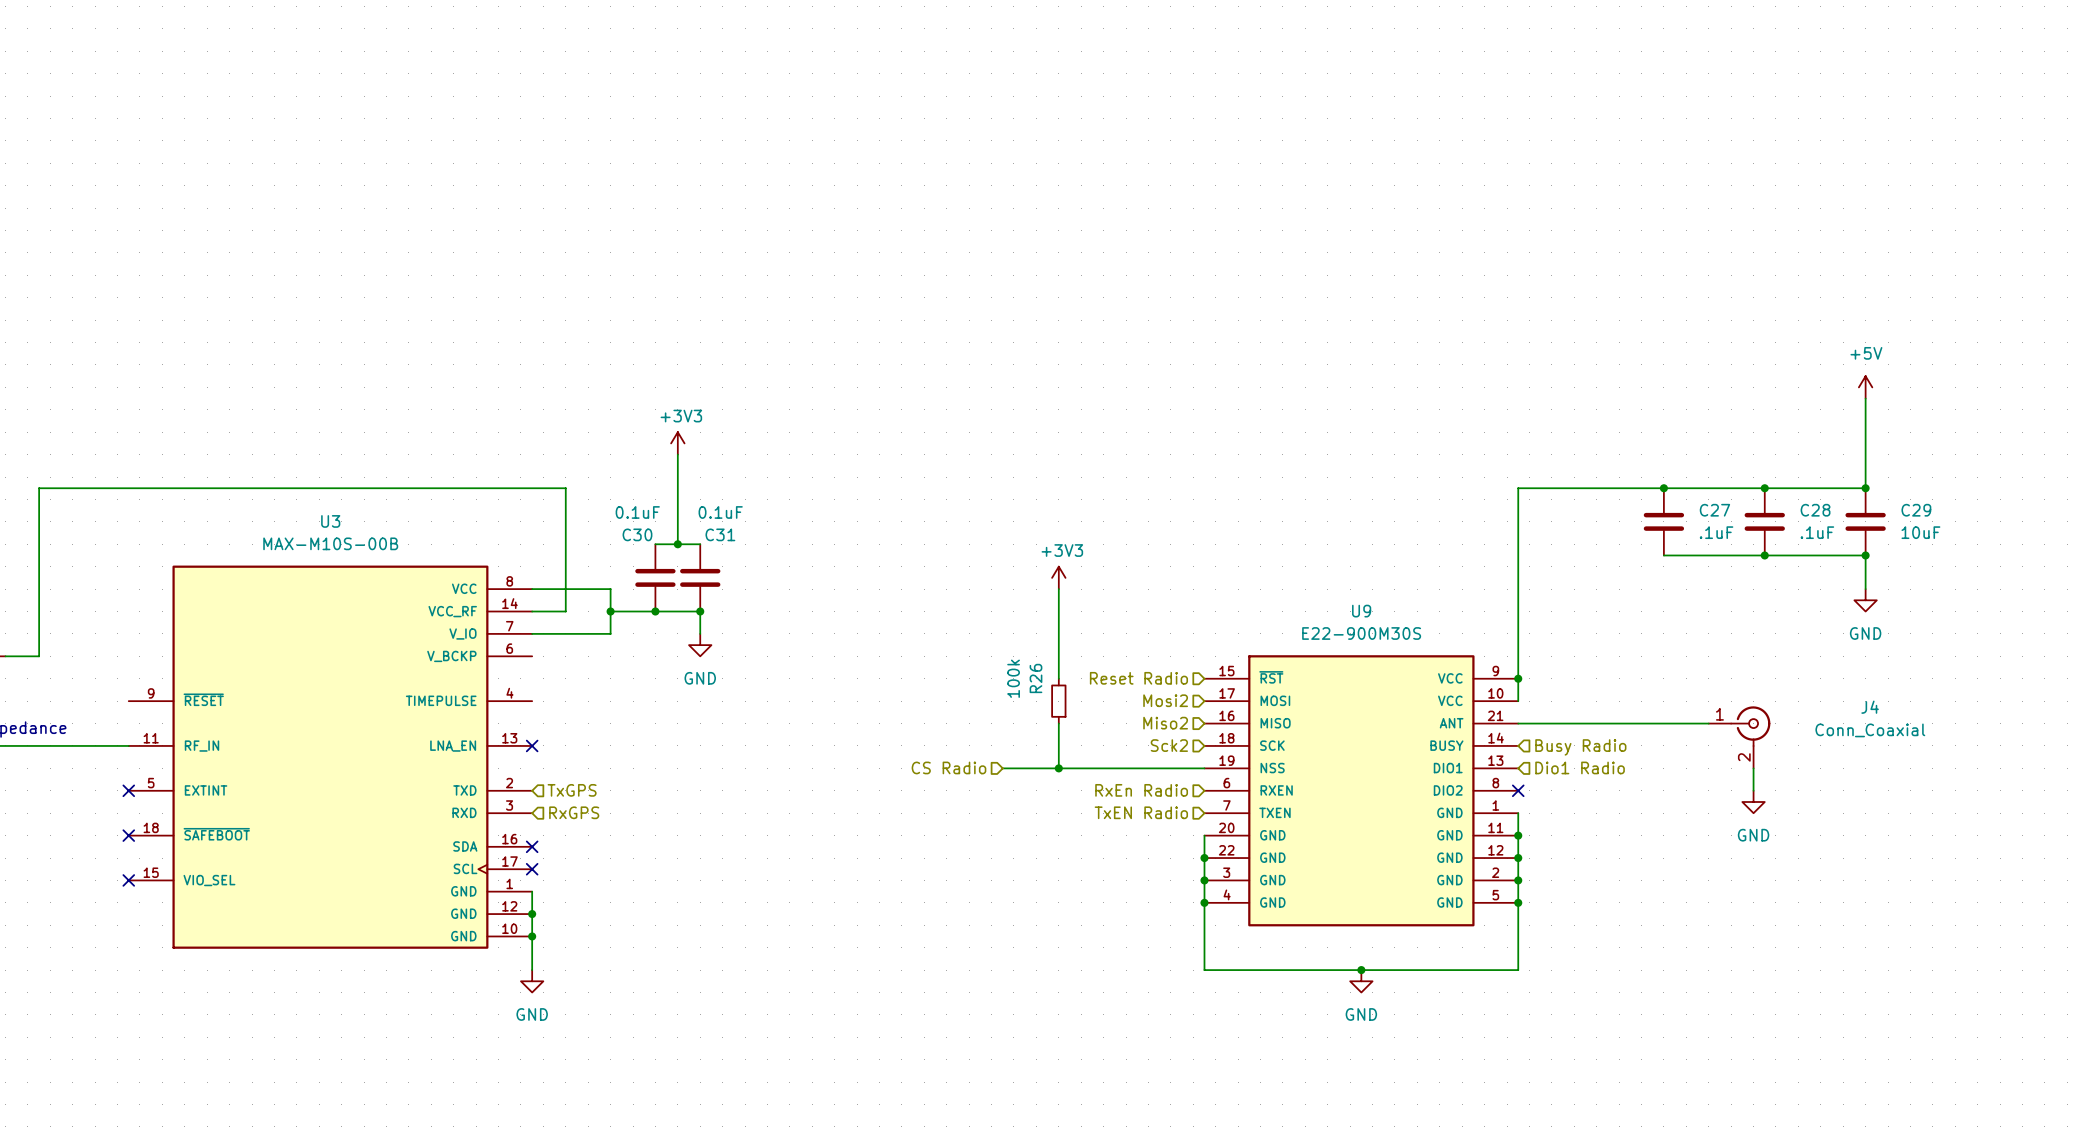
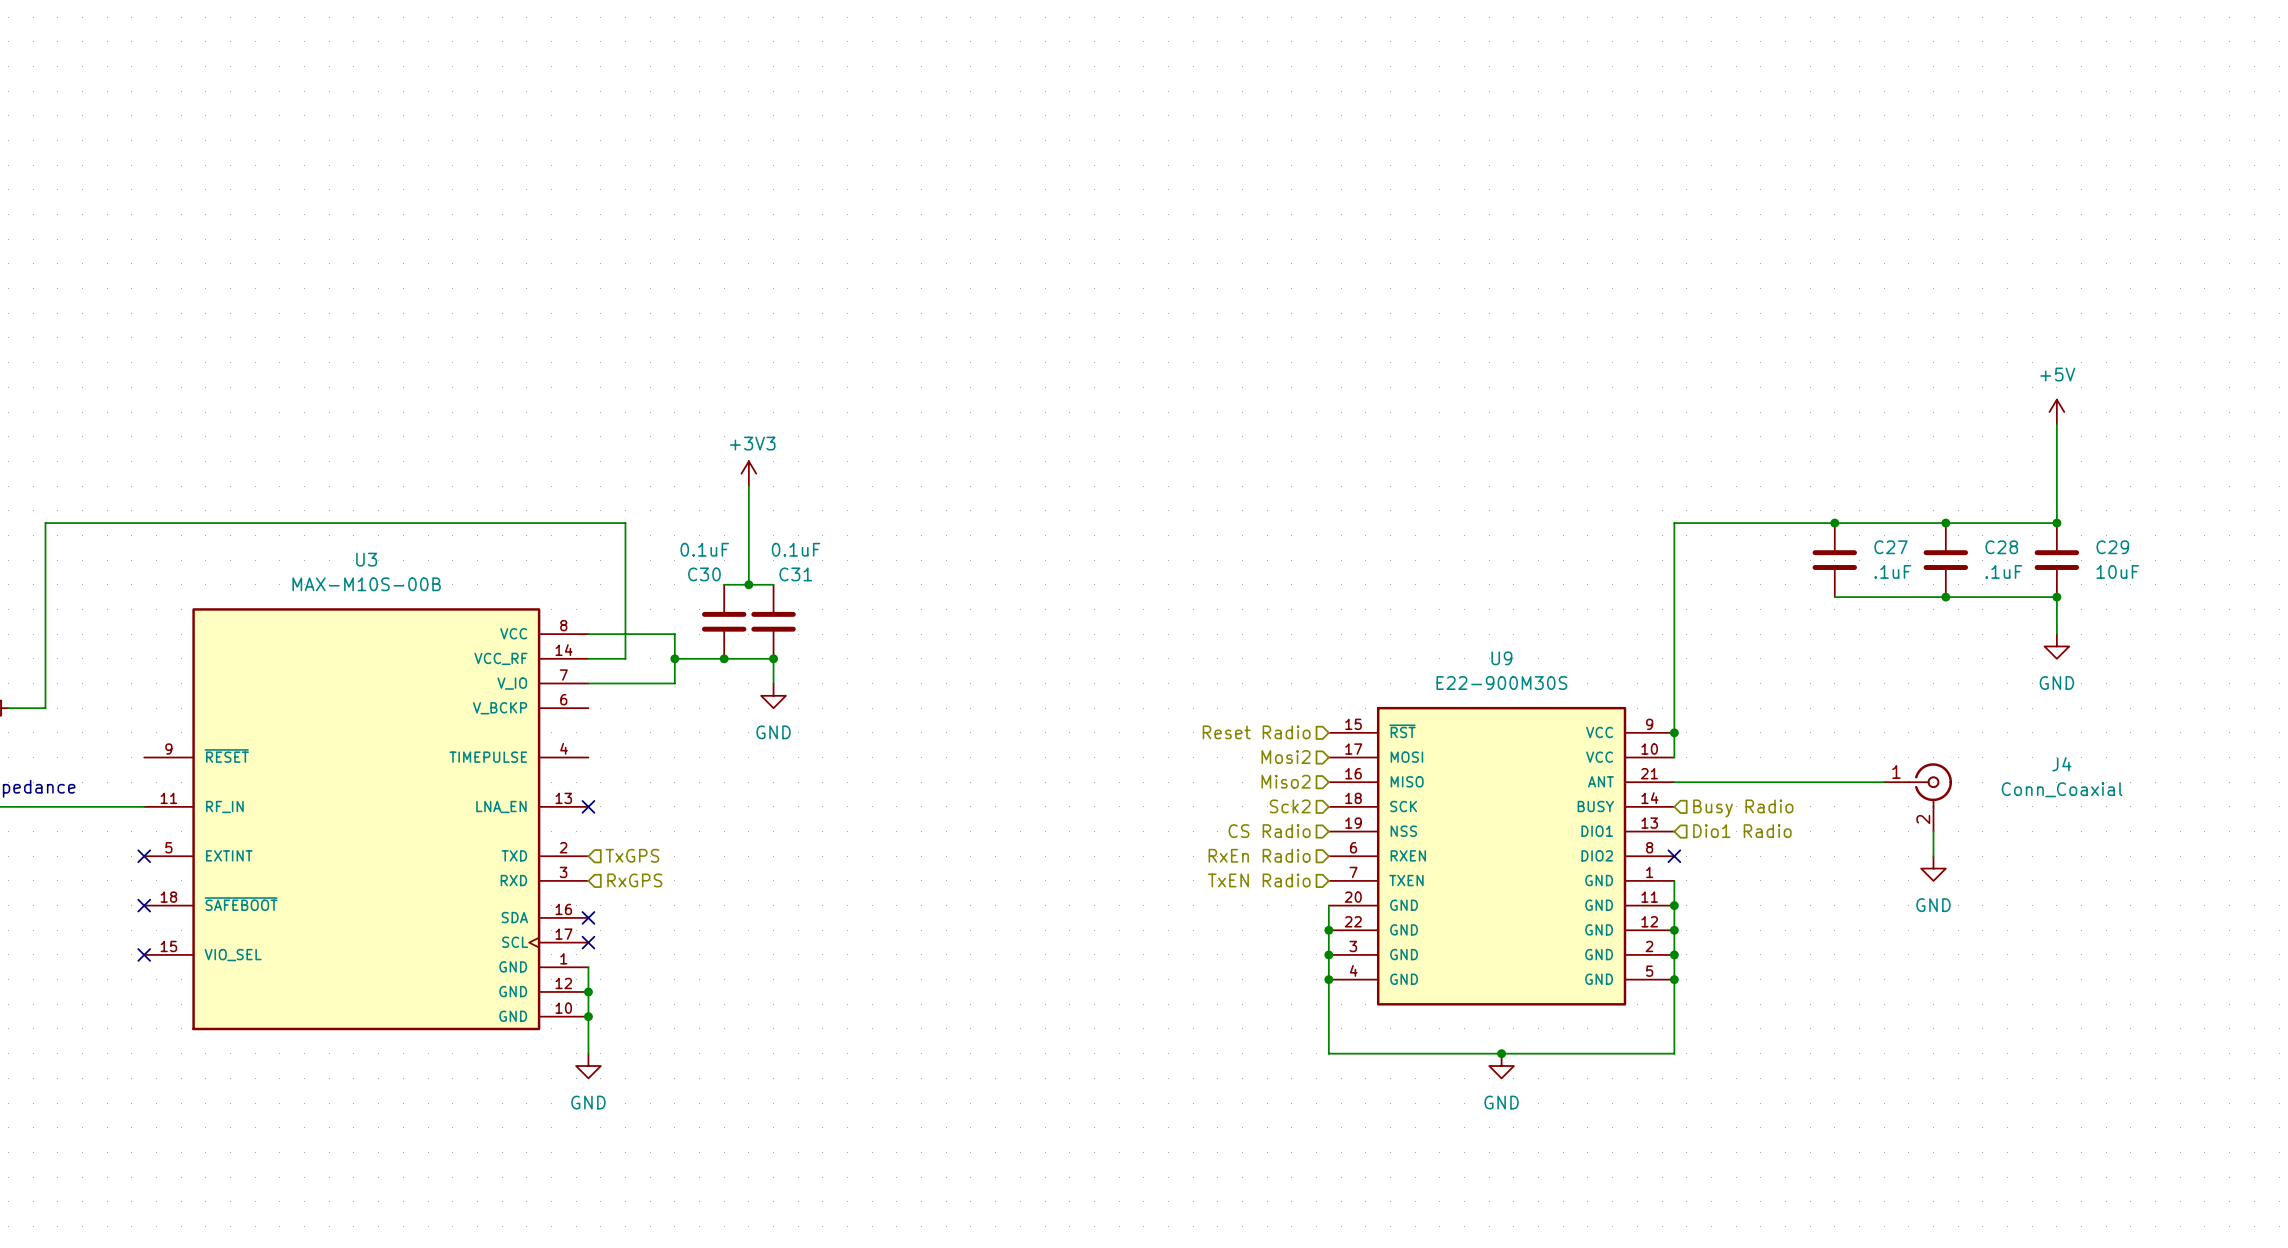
power symbol: +3V3 (1058, 577) -> none
wire: (1058, 589) (1058, 678) -> none
R26: 100k (1058, 701) -> none
wire: (1058, 723) (1058, 768) -> none
hierarchical label position: CS Radio (948, 767) -> CS Radio (1269, 831)
wire: (1002, 768) (1204, 768) -> none
junction: (1058, 768) -> none

